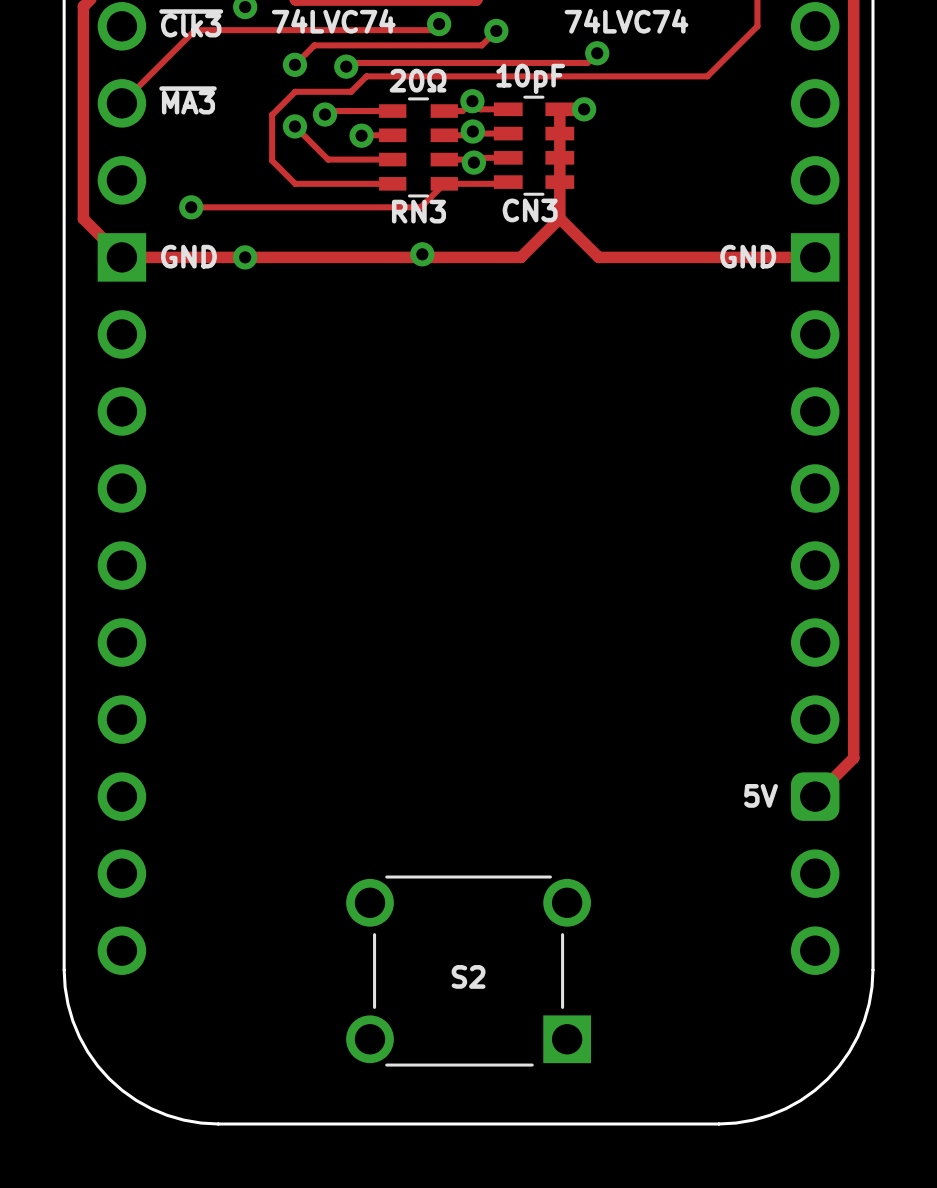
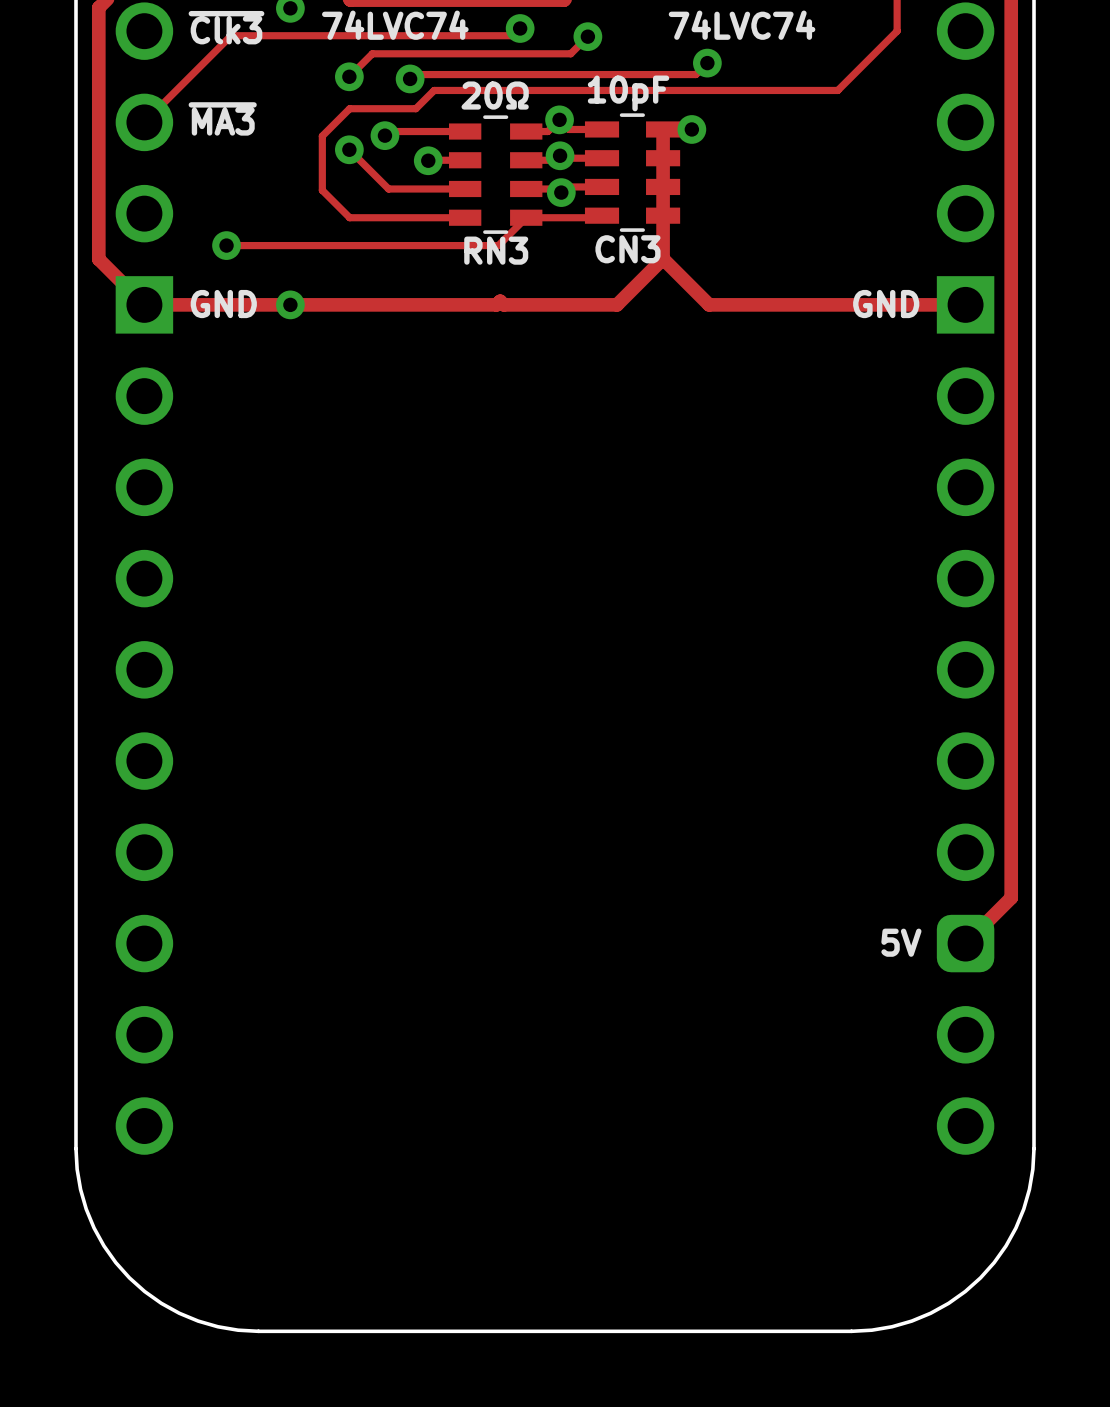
via: (422, 254) -> none
S2: (468, 971) -> none

